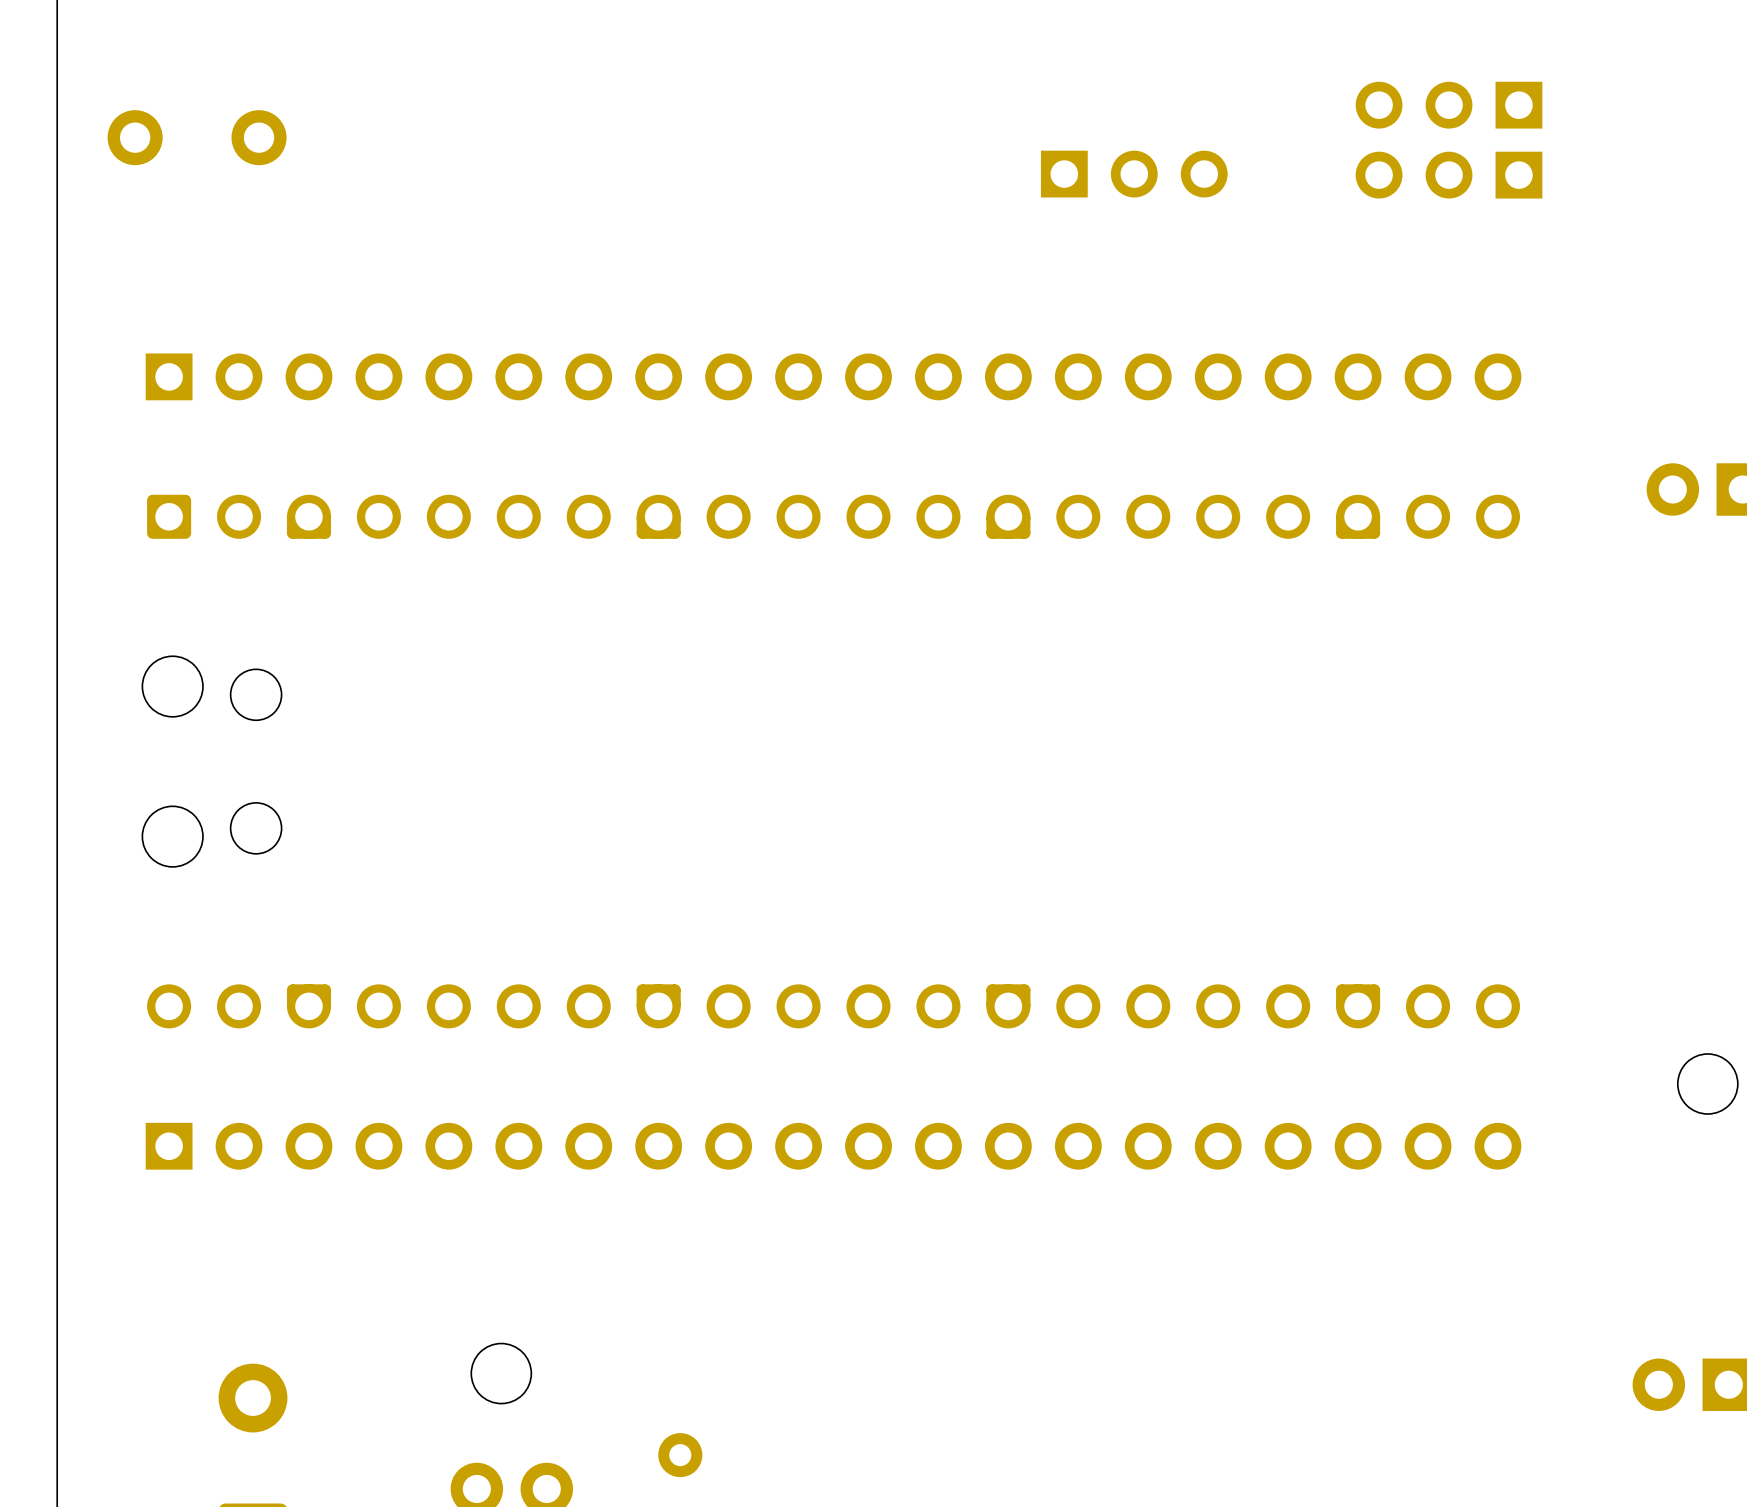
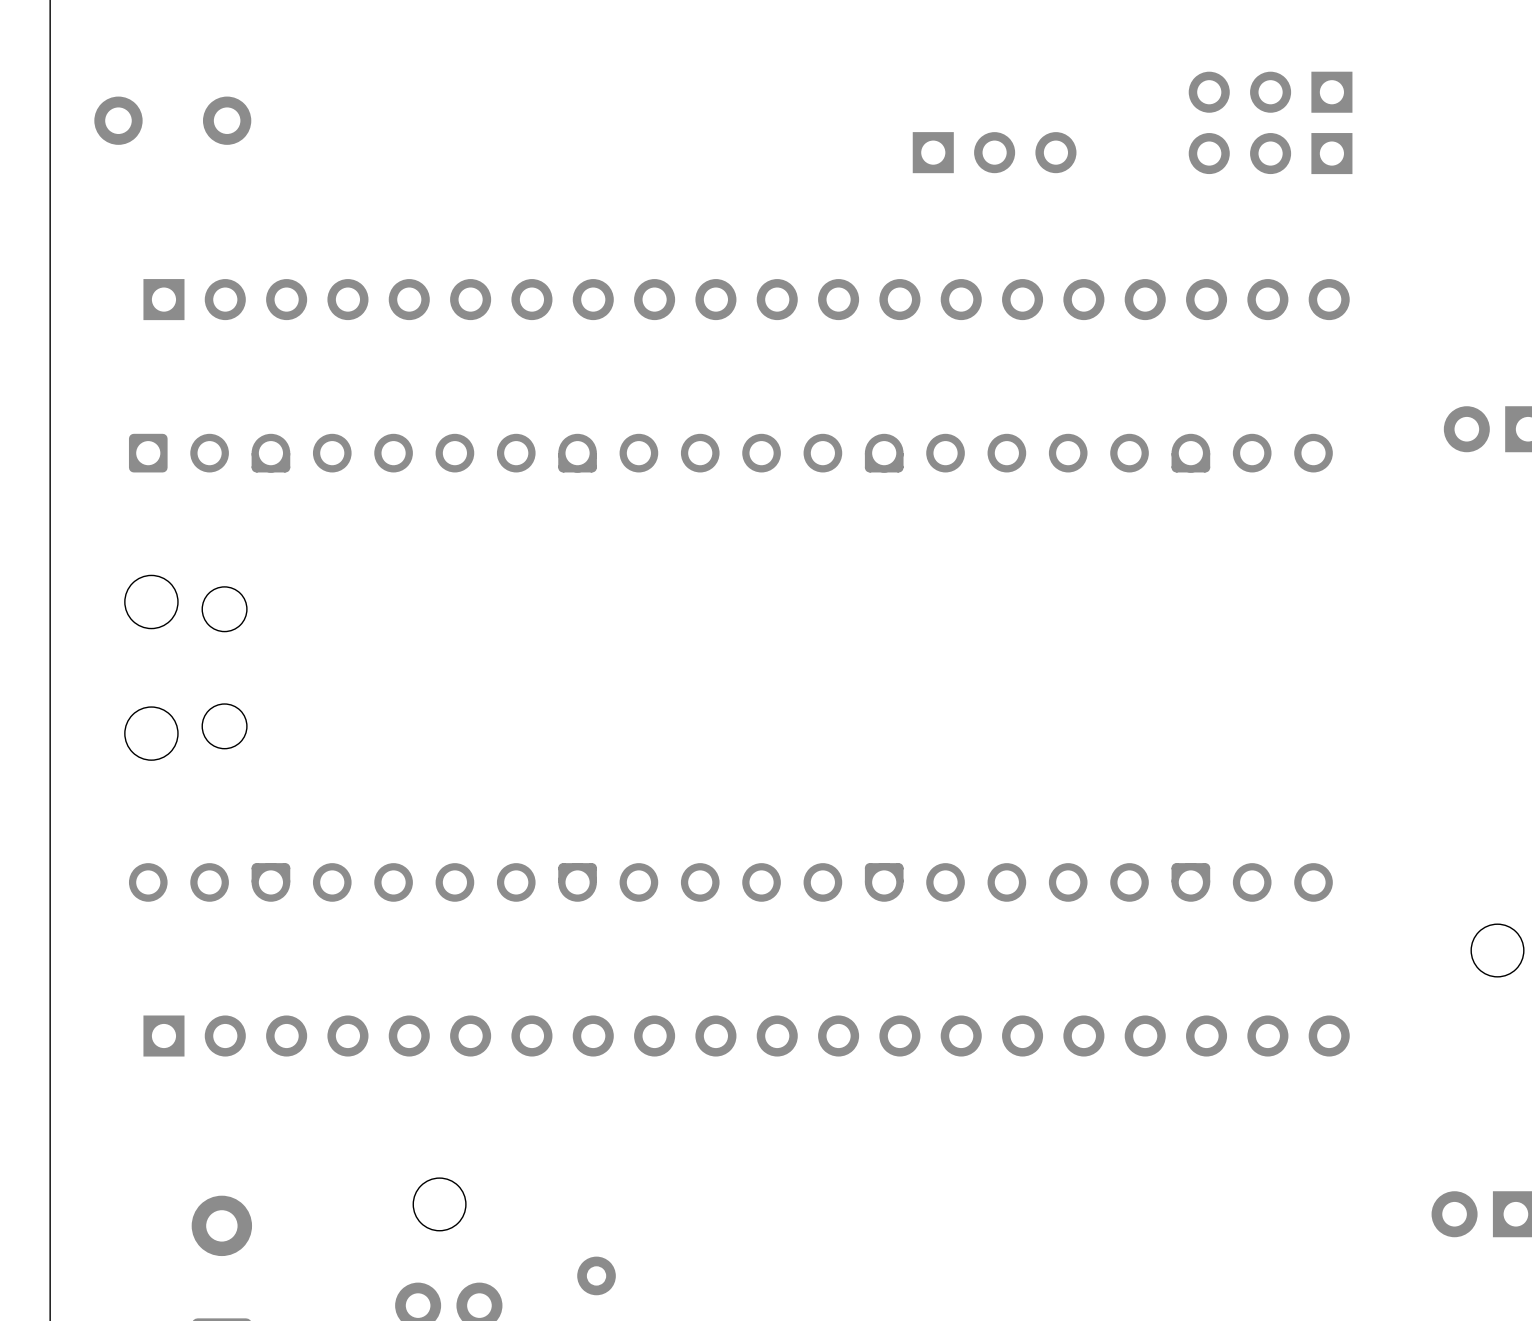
part position: (833, 376) -> (746, 299)
part position: (833, 1146) -> (746, 1036)

